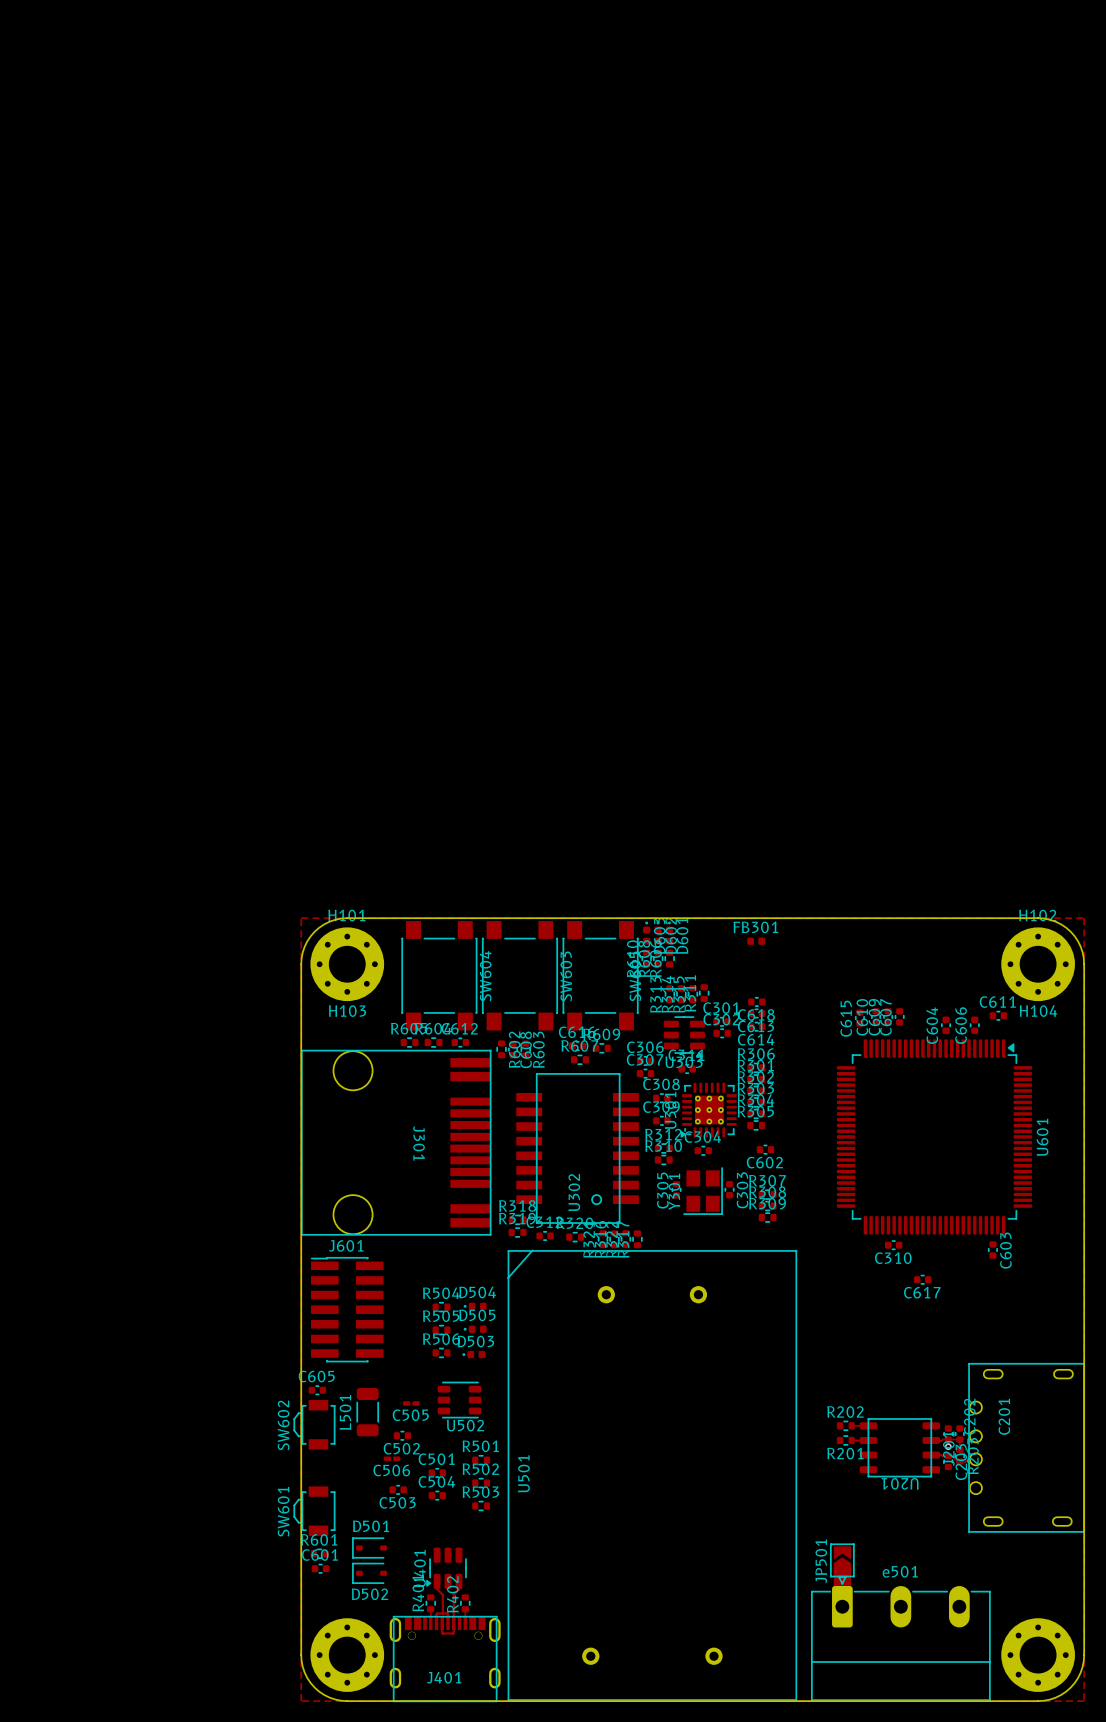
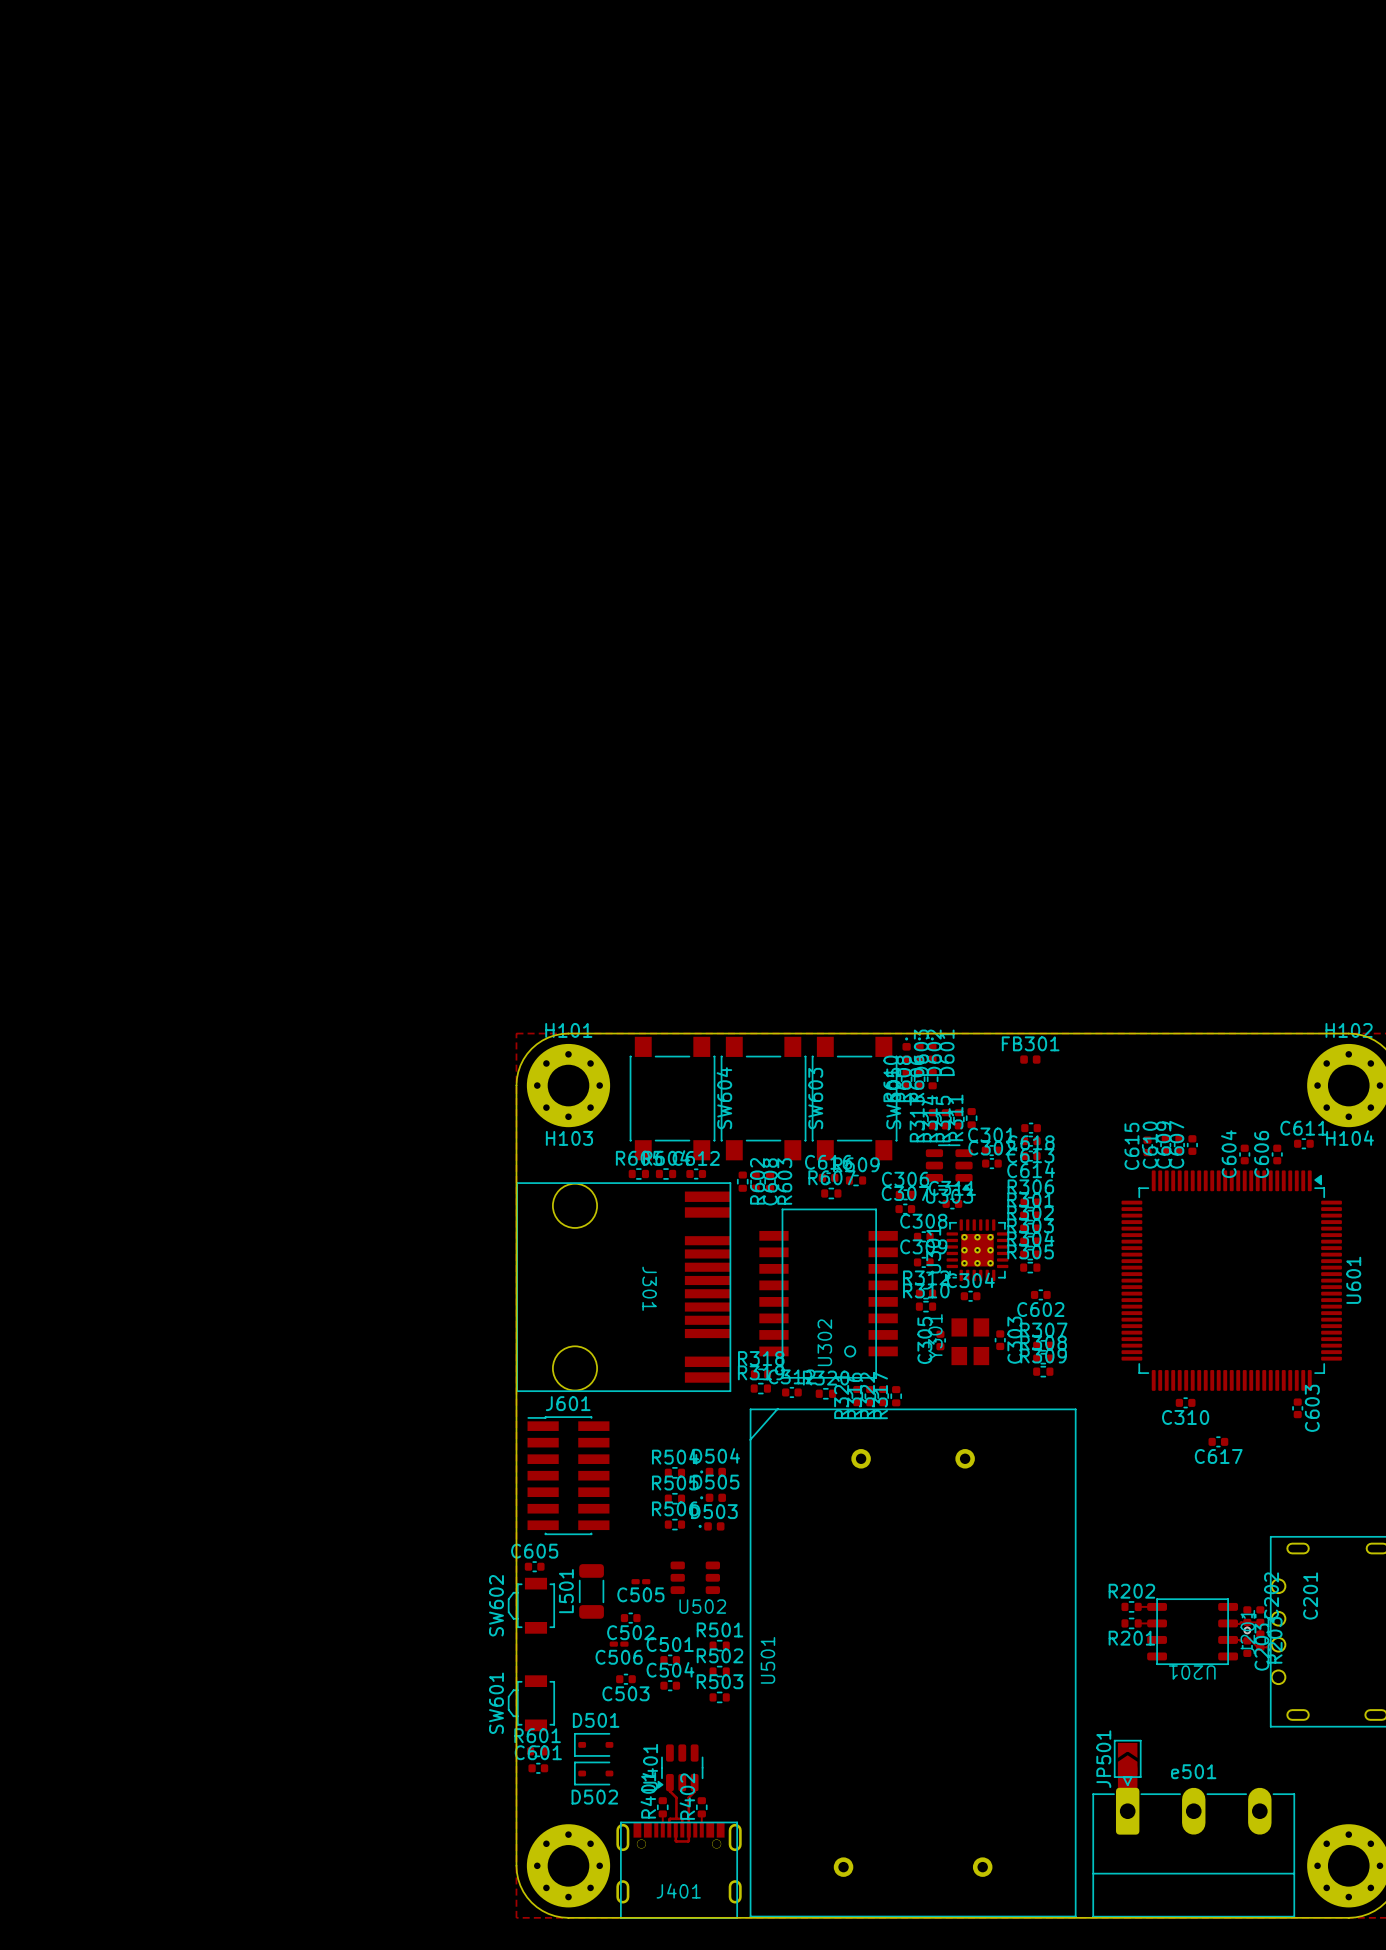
Y301 footprint: [683, 1167, 723, 1215] -> [951, 1318, 990, 1366]
U502 footprint: [437, 1381, 482, 1419] -> [670, 1561, 720, 1595]

